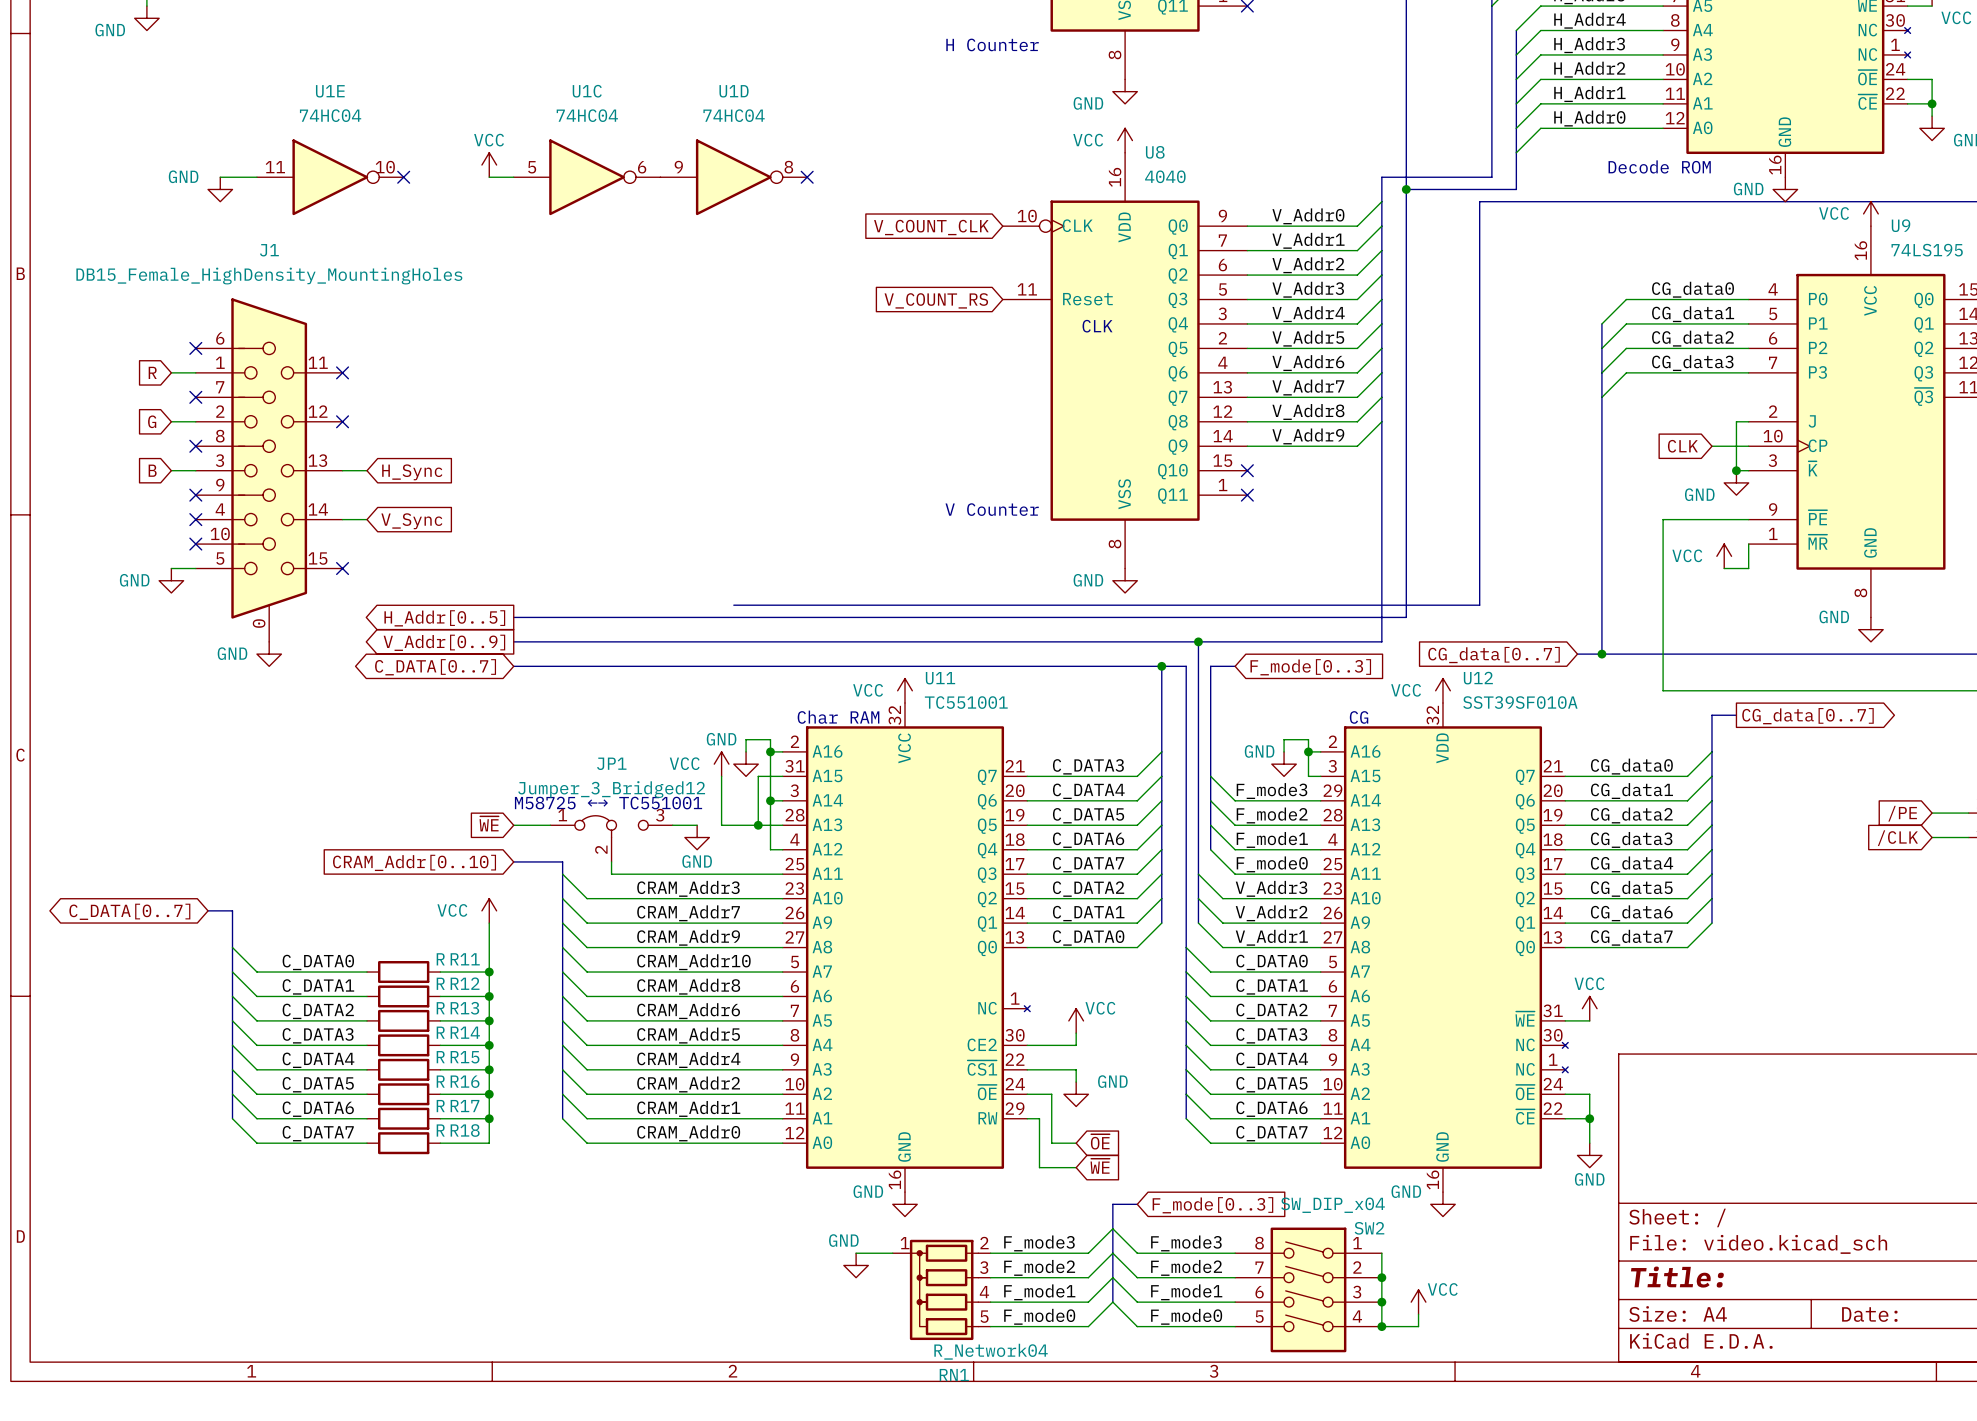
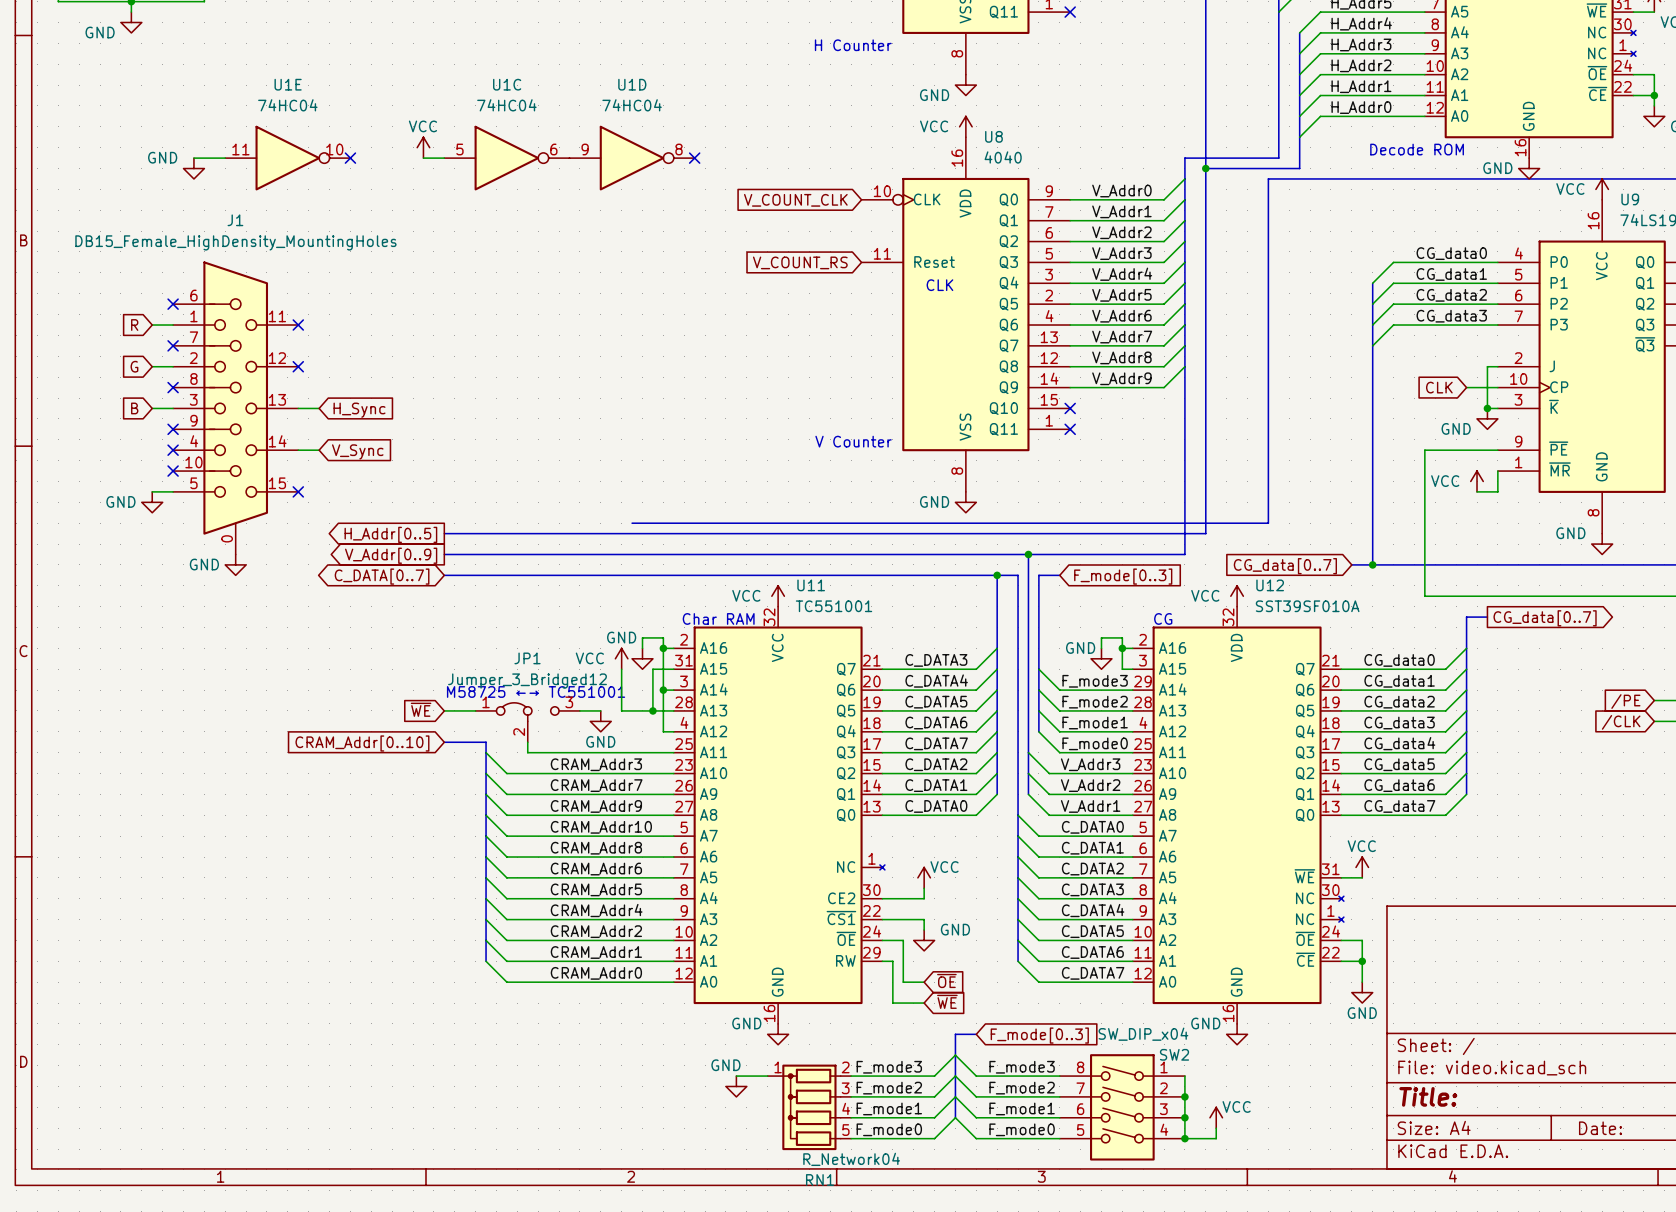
bus: (208, 910) (232, 910) (232, 1118) -> none
power symbol: VCC (489, 910) -> none
global label: C_DATA[0..7] (129, 911) -> none
wire: (489, 923) (489, 1143) (440, 1143) -> none
wire: (232, 947) (256, 972) (367, 972) -> none
label: C_DATA0 (318, 962) -> none
wire: (232, 972) (256, 996) (367, 996) -> none
R11: R (403, 972) -> none
wire: (440, 972) (489, 972) -> none
junction: (489, 972) -> none
label: C_DATA1 (318, 986) -> none
wire: (232, 996) (256, 1020) (367, 1020) -> none
R12: R (403, 996) -> none
wire: (440, 996) (489, 996) -> none
junction: (489, 996) -> none
label: C_DATA2 (318, 1011) -> none
wire: (232, 1020) (256, 1045) (367, 1045) -> none
R13: R (403, 1020) -> none
wire: (440, 1020) (489, 1020) -> none
junction: (489, 1020) -> none
label: C_DATA3 (318, 1035) -> none
wire: (232, 1045) (256, 1069) (367, 1069) -> none
R14: R (403, 1045) -> none
wire: (440, 1045) (489, 1045) -> none
junction: (489, 1045) -> none
label: C_DATA4 (318, 1060) -> none
wire: (232, 1069) (256, 1094) (367, 1094) -> none
R15: R (403, 1069) -> none
wire: (440, 1069) (489, 1069) -> none
junction: (489, 1069) -> none
label: C_DATA5 (318, 1084) -> none
wire: (232, 1094) (256, 1118) (367, 1118) -> none
R16: R (403, 1094) -> none
wire: (440, 1094) (489, 1094) -> none
junction: (489, 1094) -> none
label: C_DATA6 (318, 1109) -> none
wire: (232, 1118) (256, 1143) (367, 1143) -> none
R17: R (403, 1118) -> none
wire: (440, 1118) (489, 1118) -> none
junction: (489, 1118) -> none
label: C_DATA7 (318, 1133) -> none
R18: R (403, 1143) -> none

